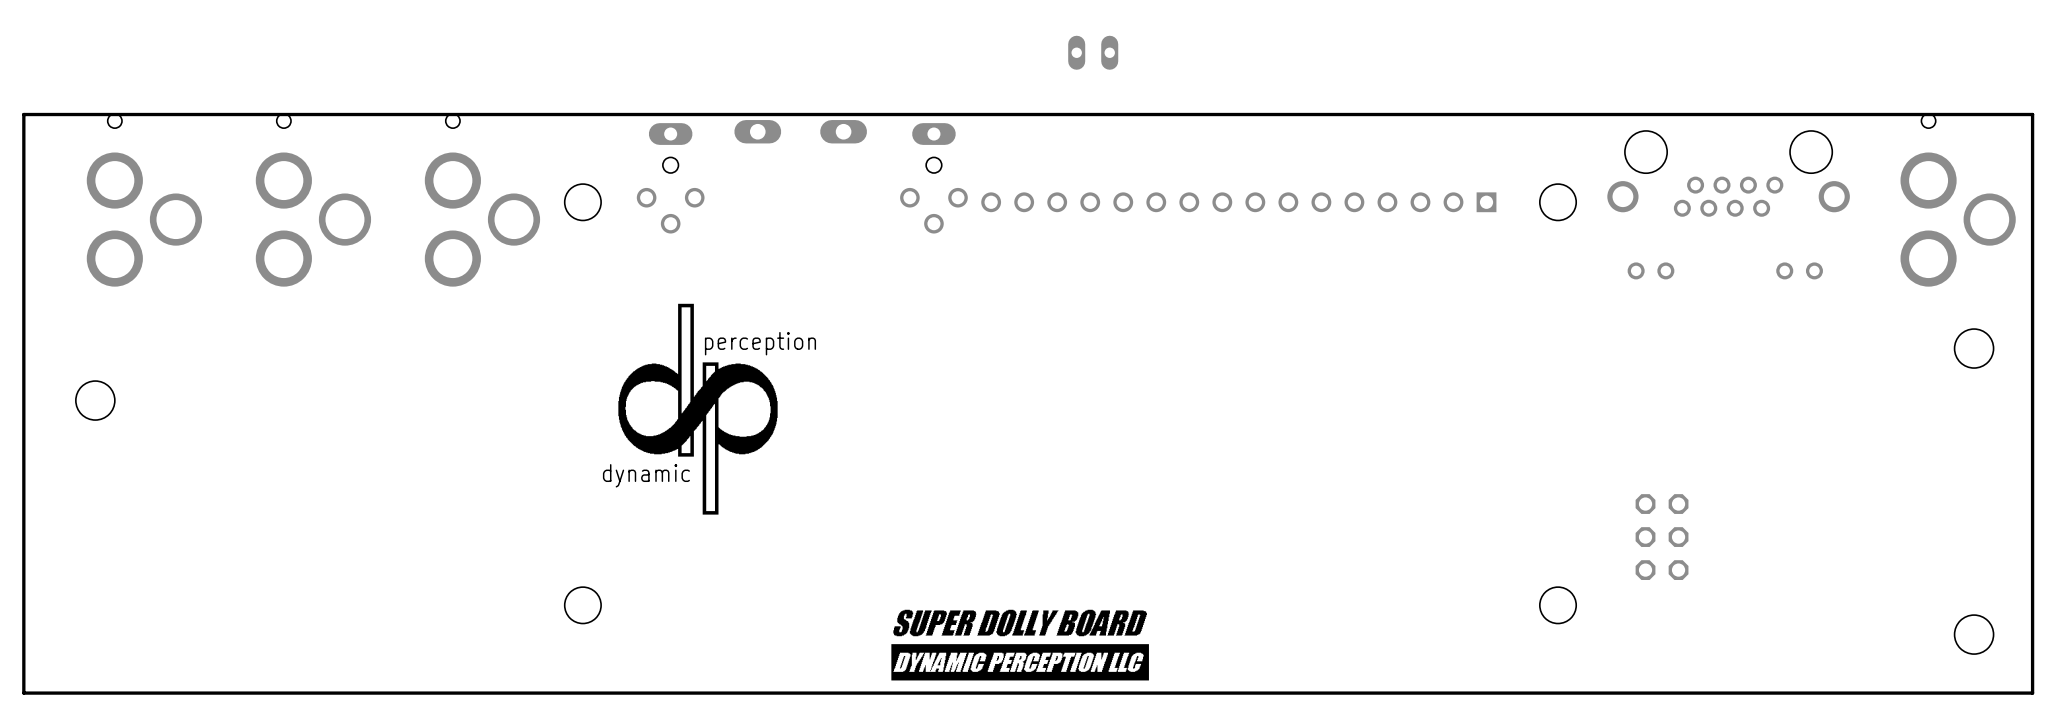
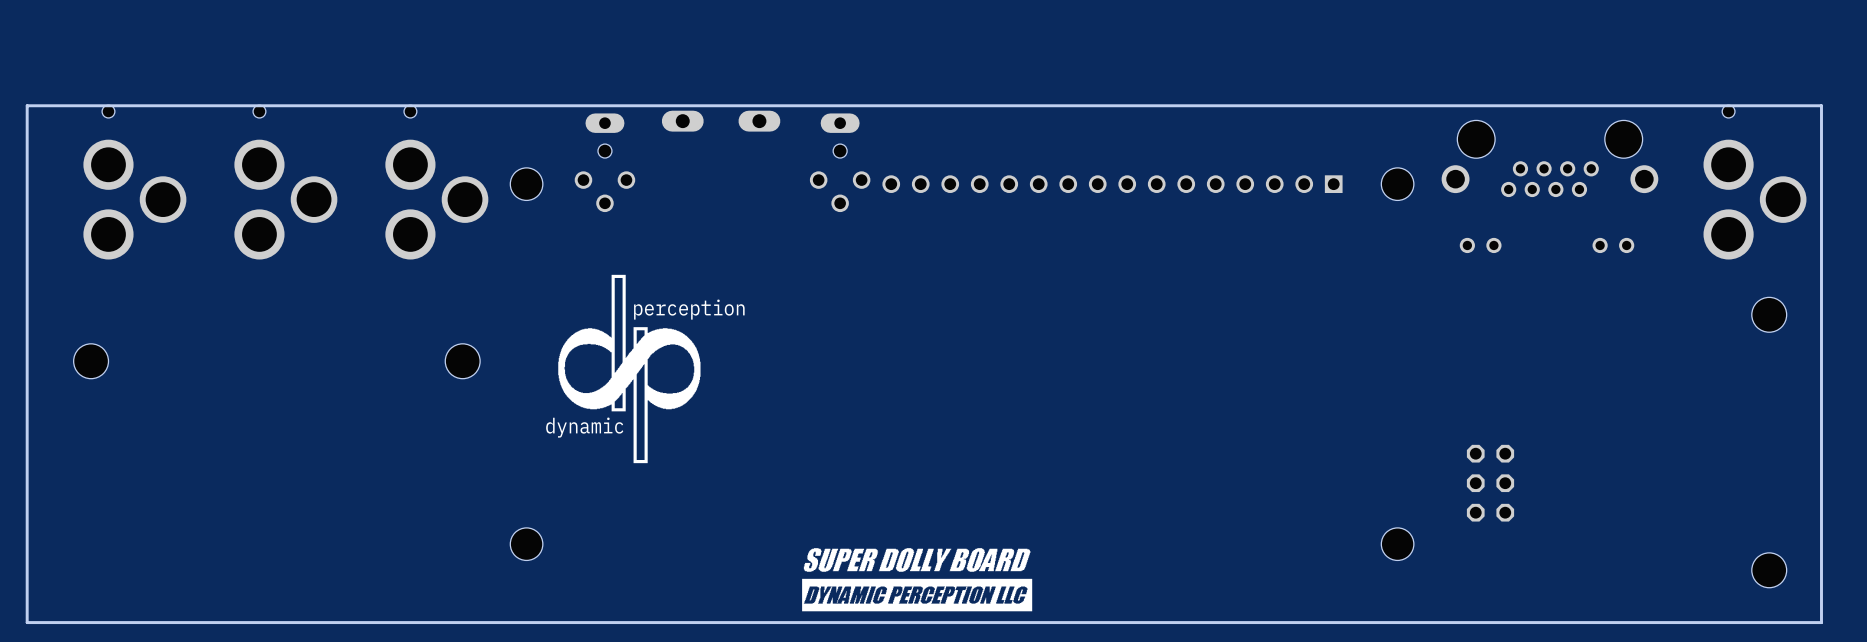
part: (1093, 52) -> none
part: none -> (462, 361)

